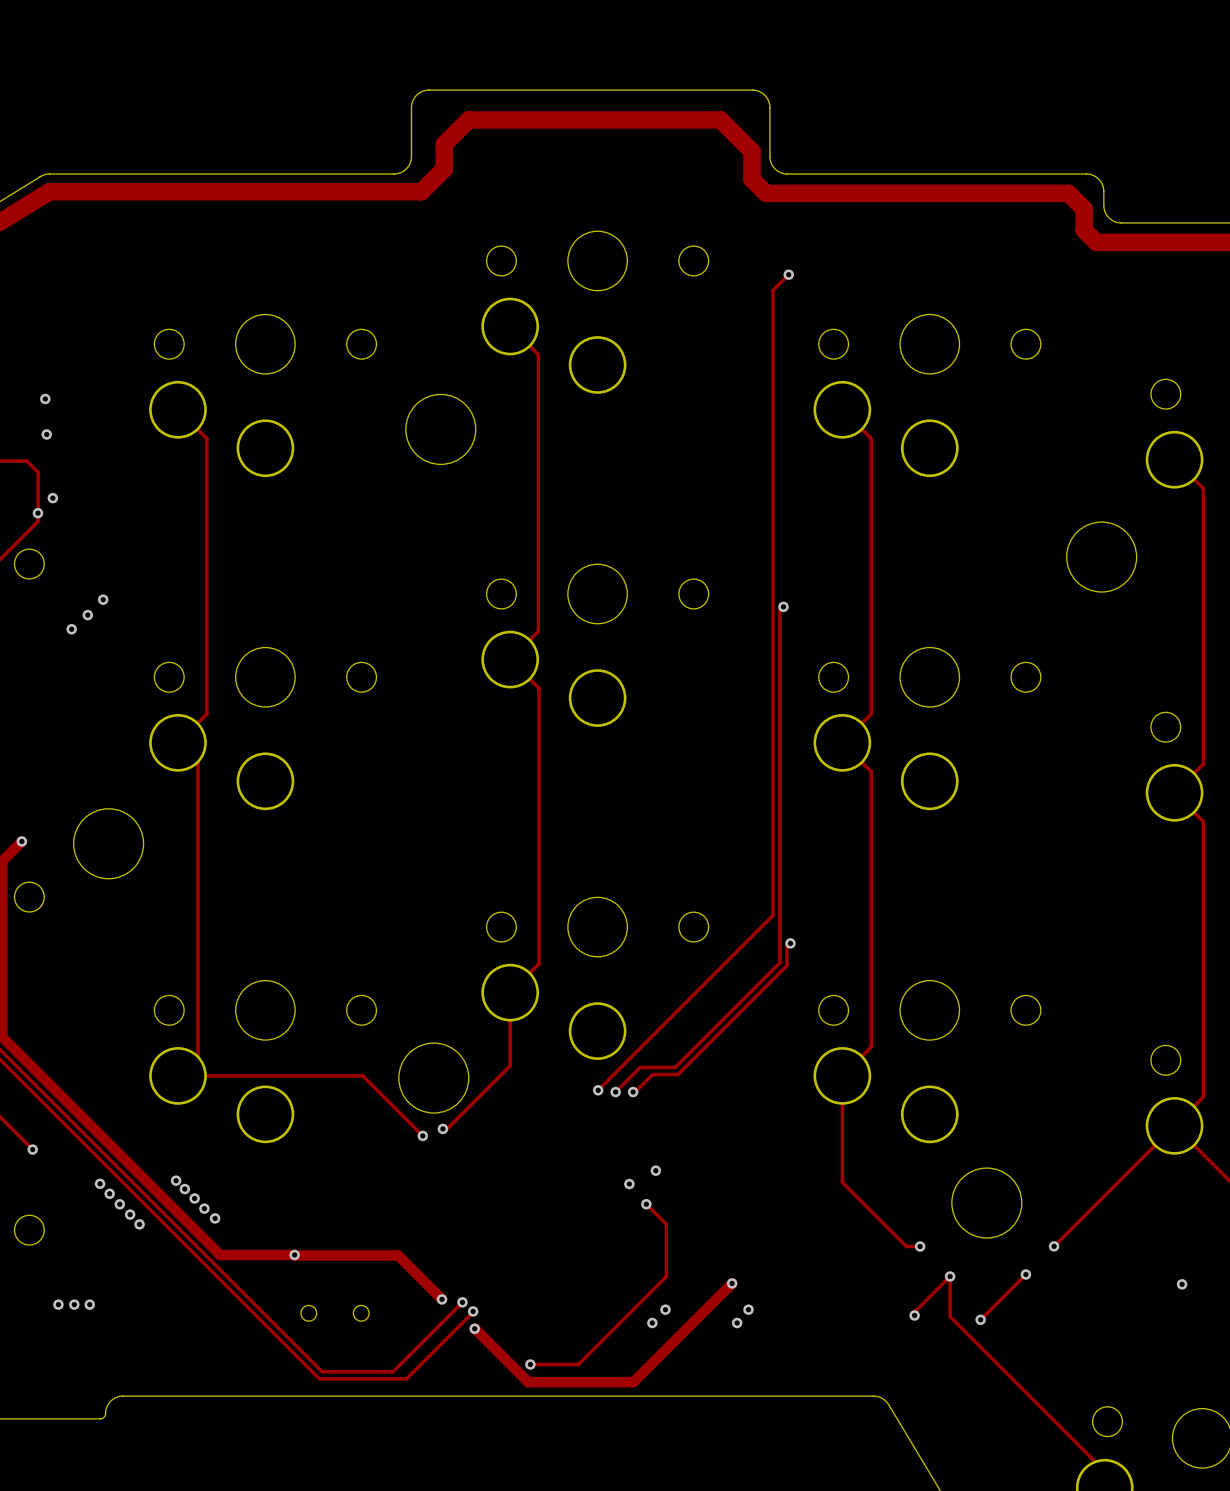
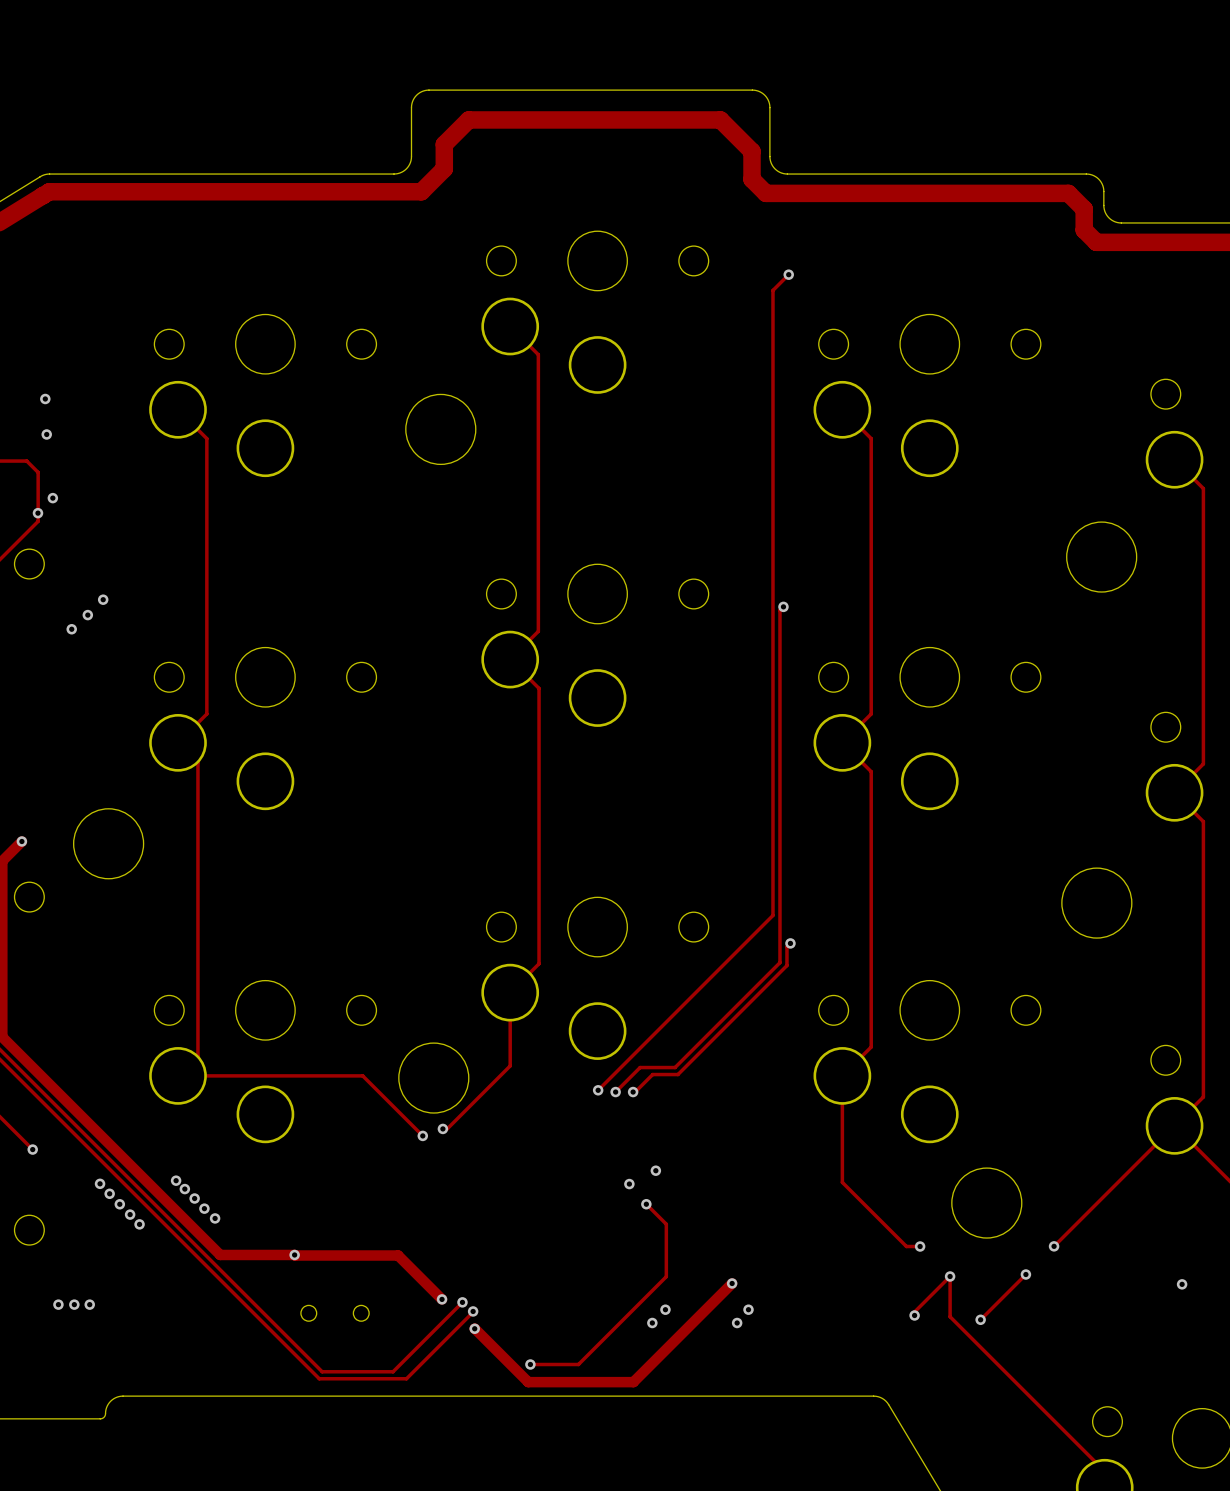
round board edge: none -> [1061, 867, 1133, 939]

